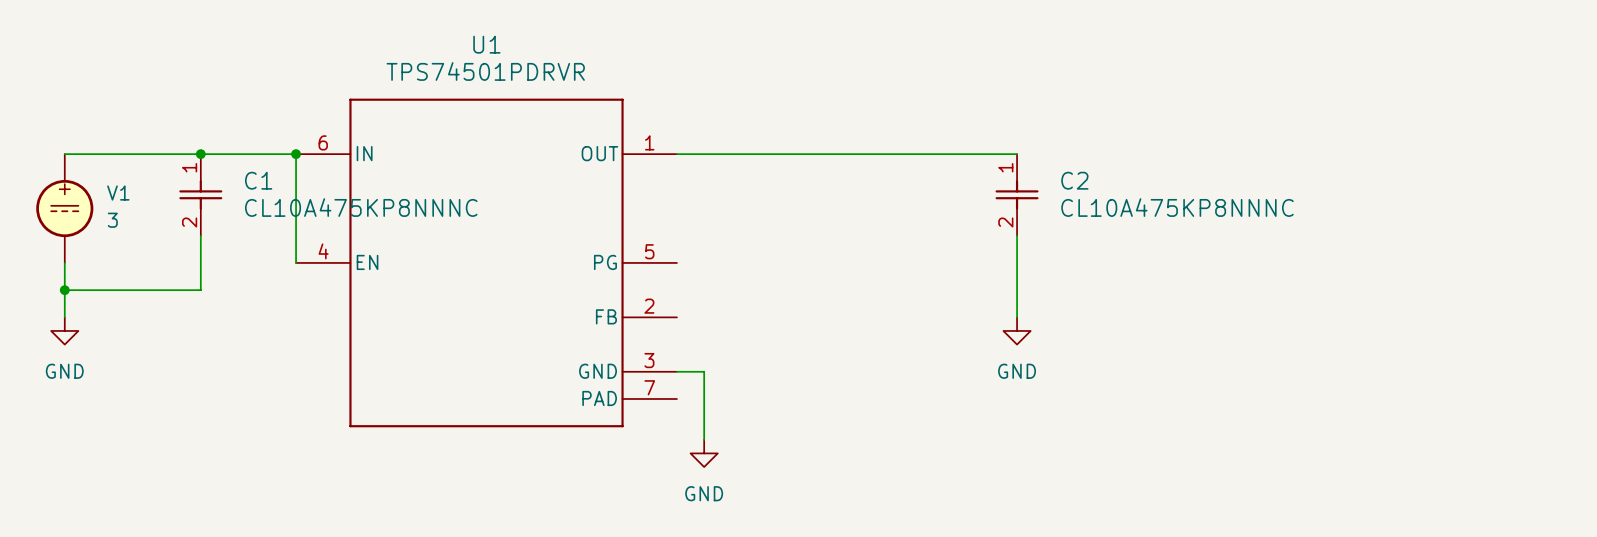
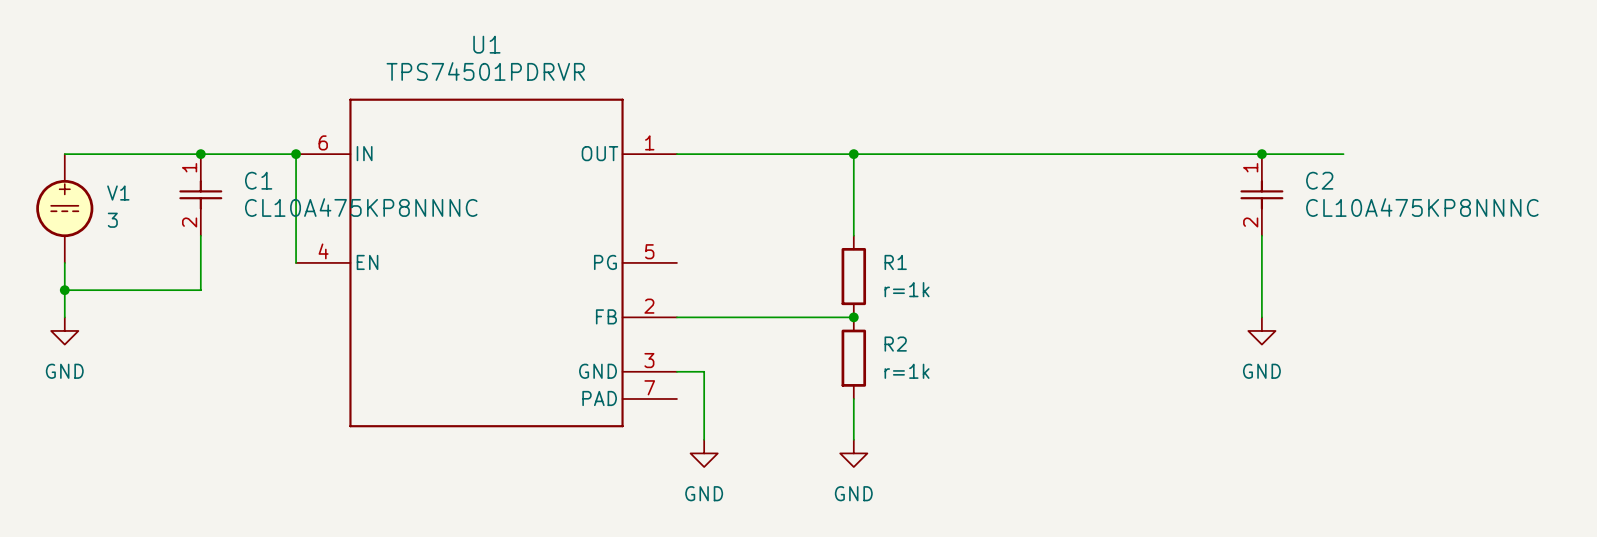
junction: none -> (853, 154)
wire: none -> (1017, 154) (1343, 154)
junction: none -> (1261, 154)
C2 position: (1017, 194) -> (1261, 194)
wire: (1017, 235) (1017, 317) -> (853, 154) (853, 235)
wire: none -> (1261, 235) (1261, 317)
R1: none -> r=1k (853, 276)
wire: none -> (676, 317) (853, 317)
junction: none -> (853, 317)
power symbol: GND (1017, 330) -> none
power symbol: none -> GND (1261, 330)
R2: none -> r=1k (853, 358)
wire: none -> (853, 398) (853, 439)
power symbol: none -> GND (853, 453)

